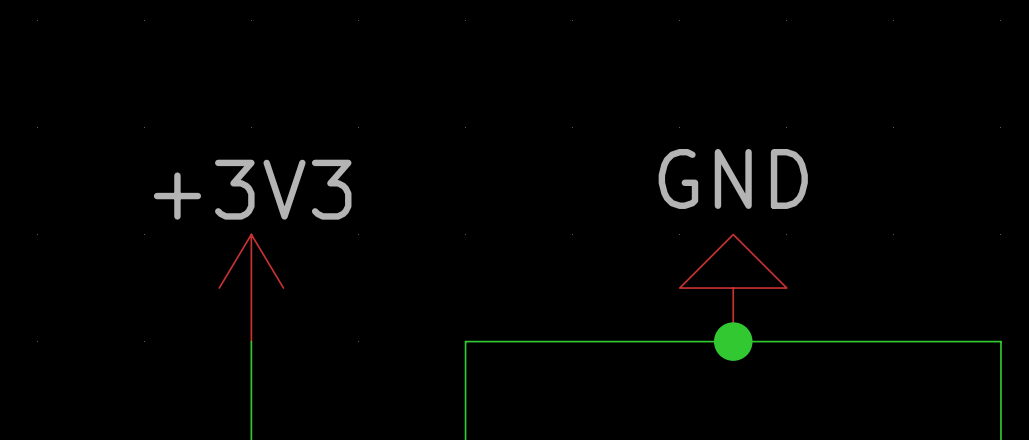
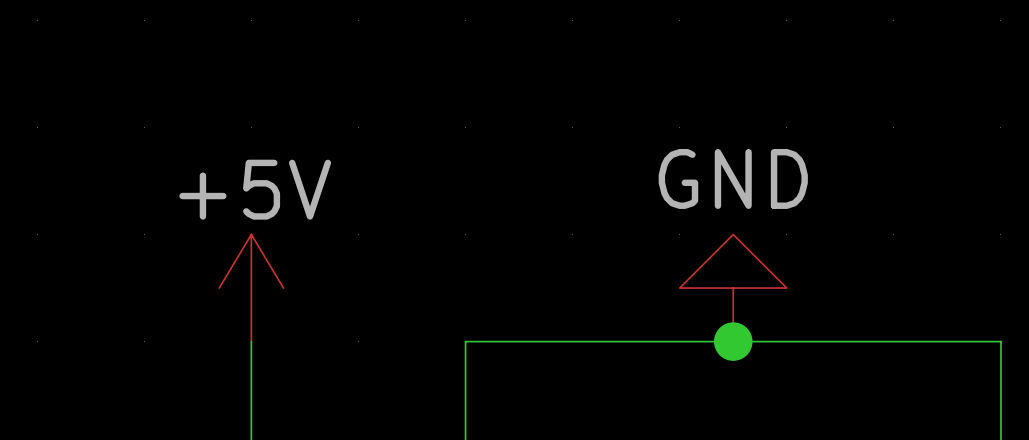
power symbol: +3V3 (251, 288) -> +5V (251, 288)

